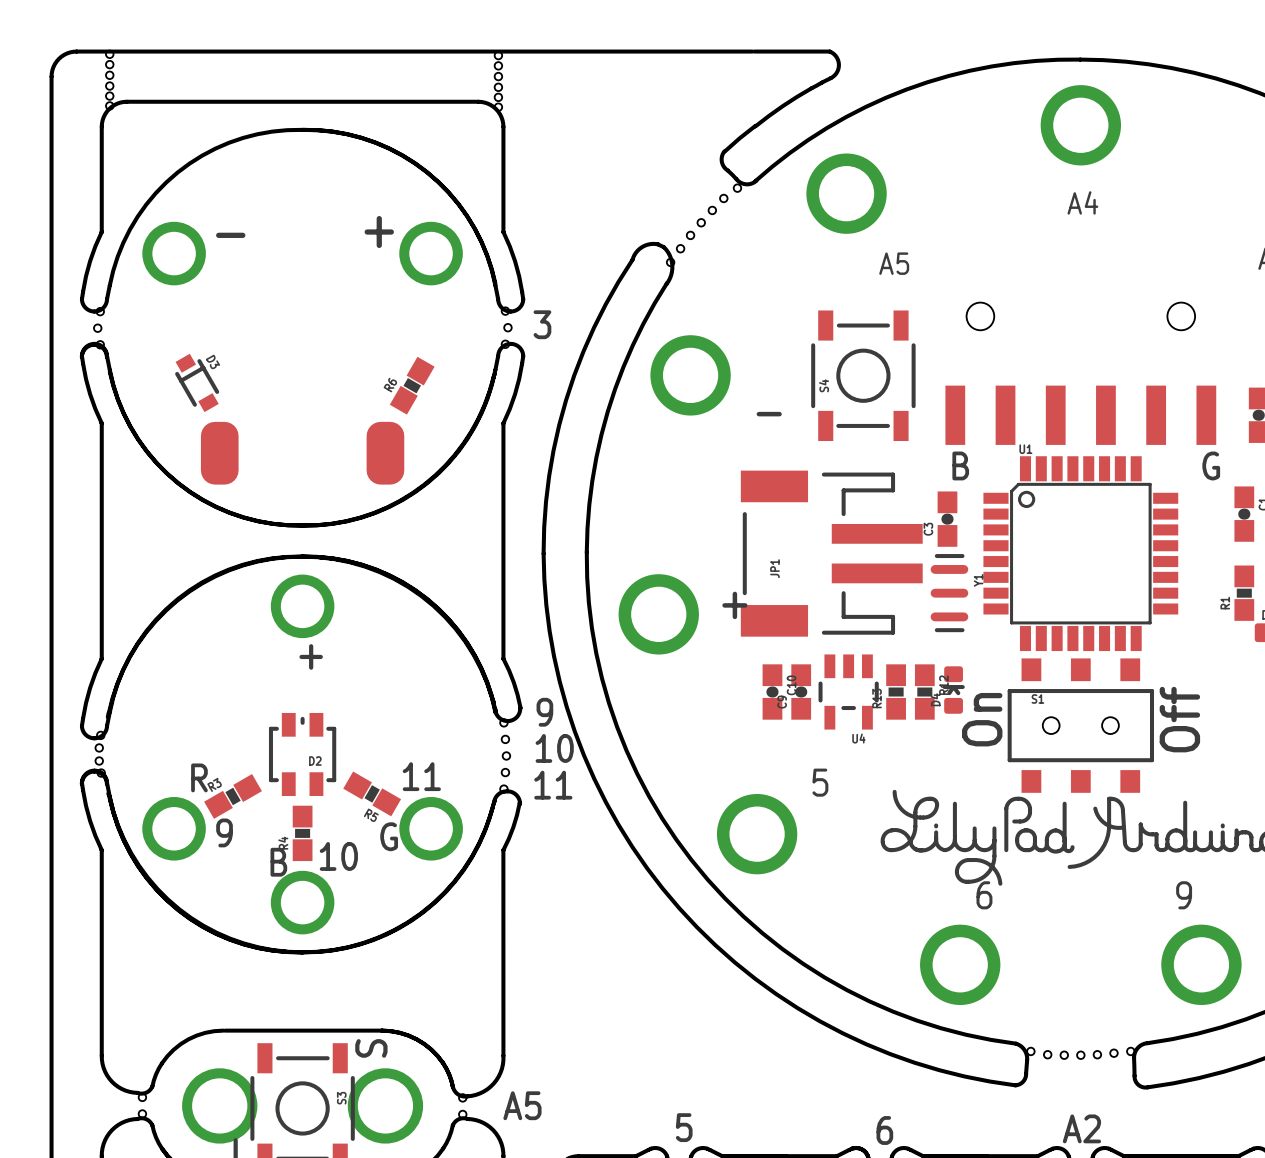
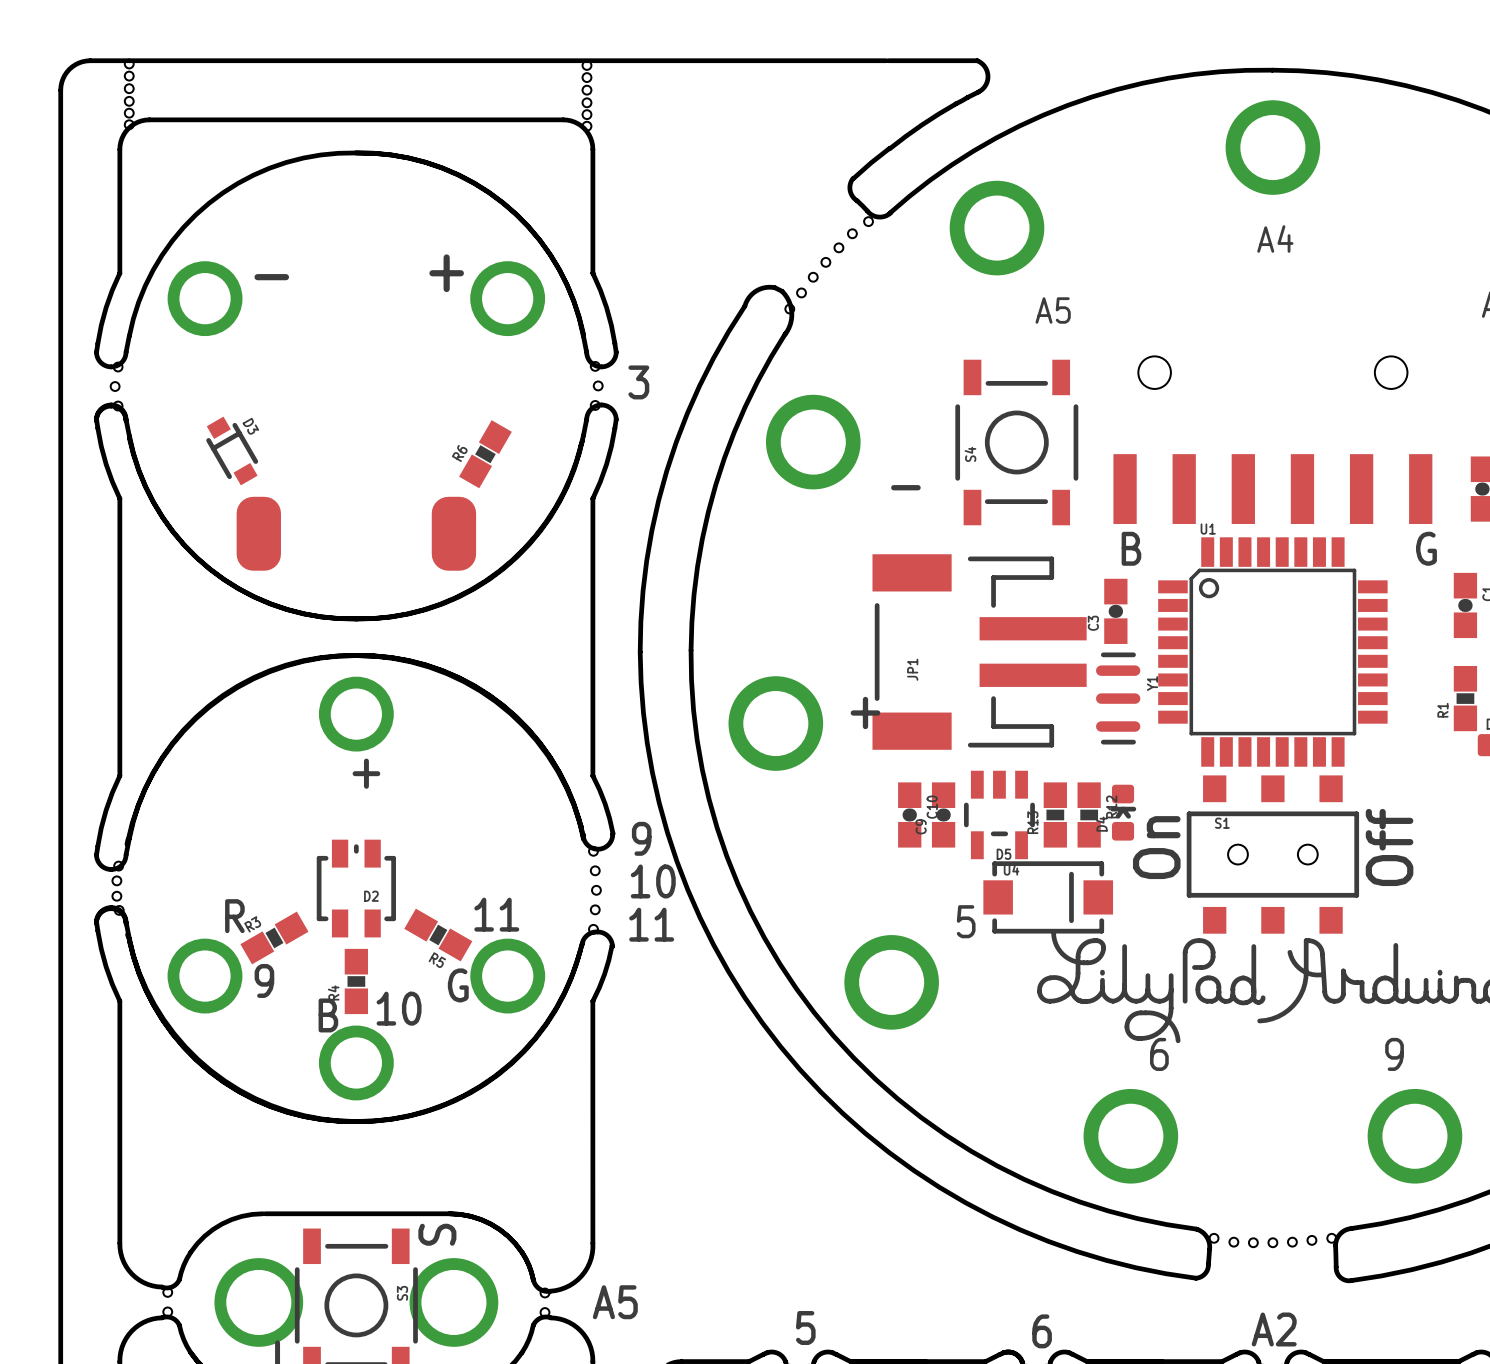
S4 footprint: [811, 310, 916, 442] -> [955, 359, 1079, 526]
D5: none -> (1048, 897)

